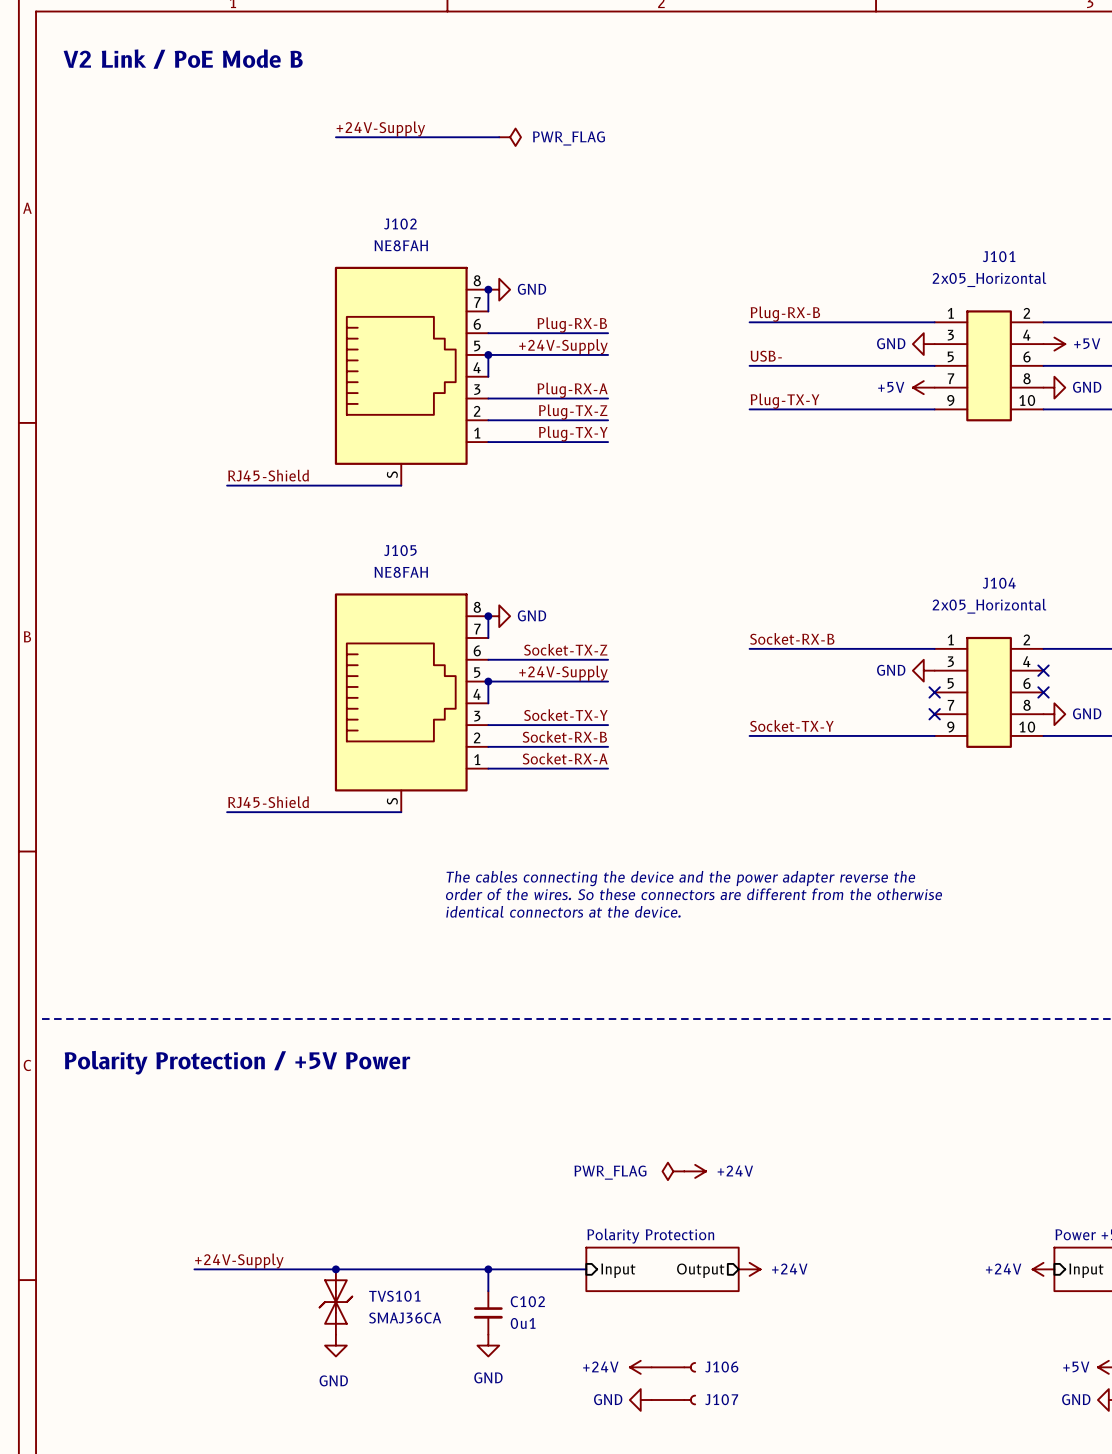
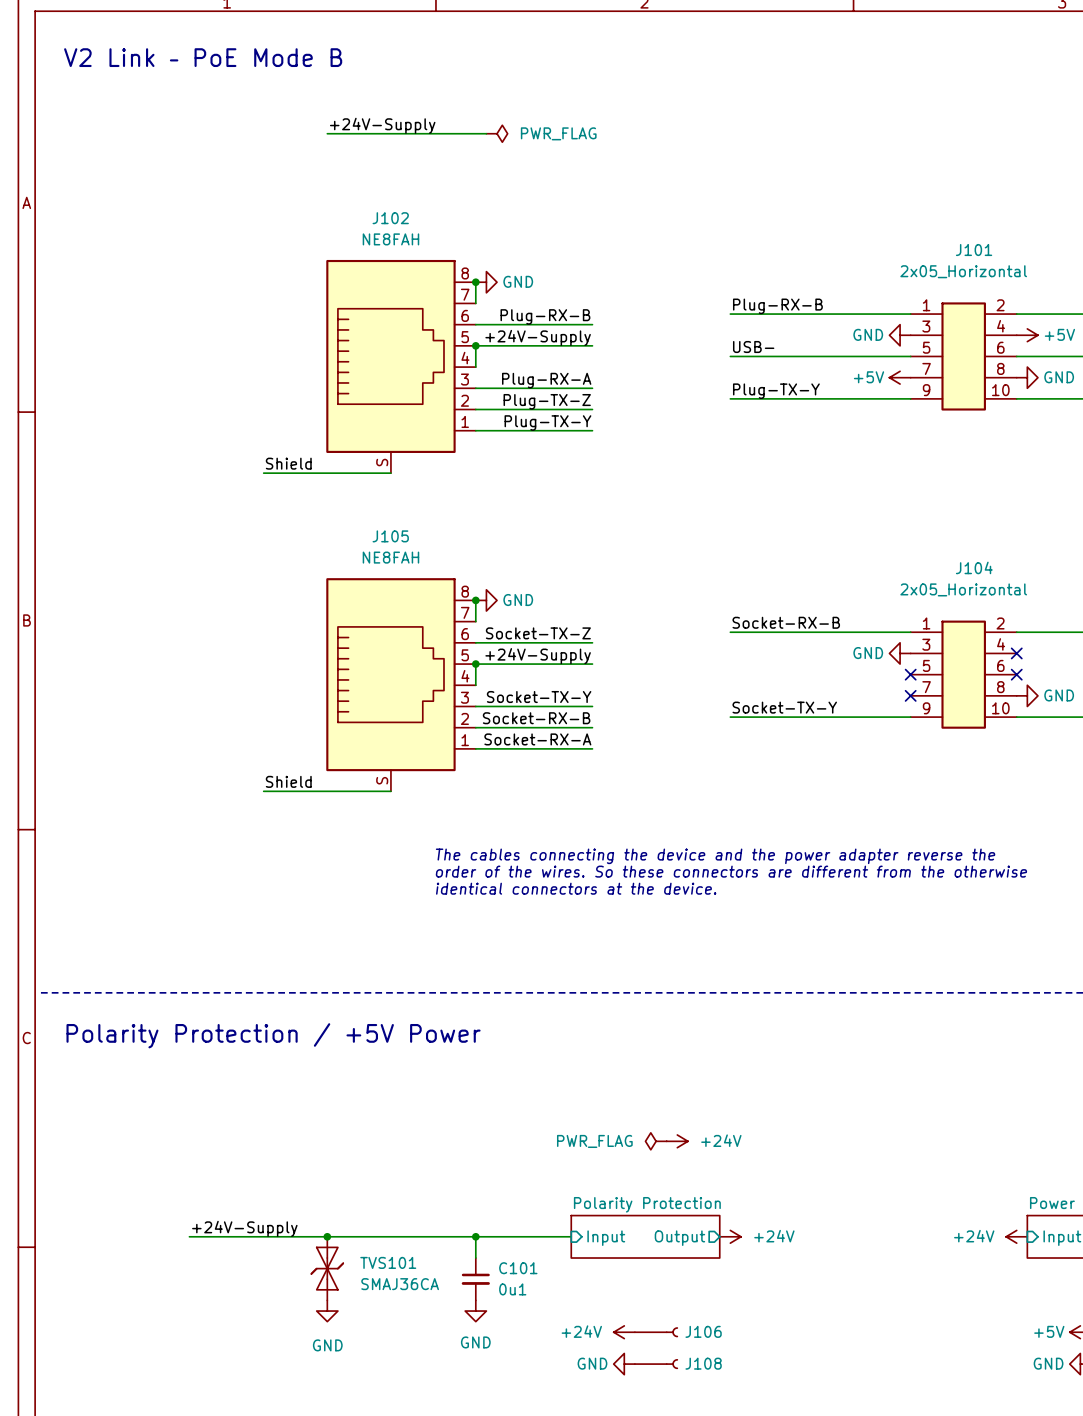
text: V2 Link / PoE Mode B (183, 59) -> V2 Link – PoE Mode B (203, 57)
label: RJ45-Shield (268, 475) -> Shield (288, 463)
wire: (227, 485) (270, 485) -> none
label: RJ45-Shield (268, 802) -> Shield (288, 781)
wire: (227, 812) (270, 812) -> none
C102 name: C102 (527, 1301) -> C101 (518, 1268)
J107 name: J107 (721, 1399) -> J108 (703, 1363)

